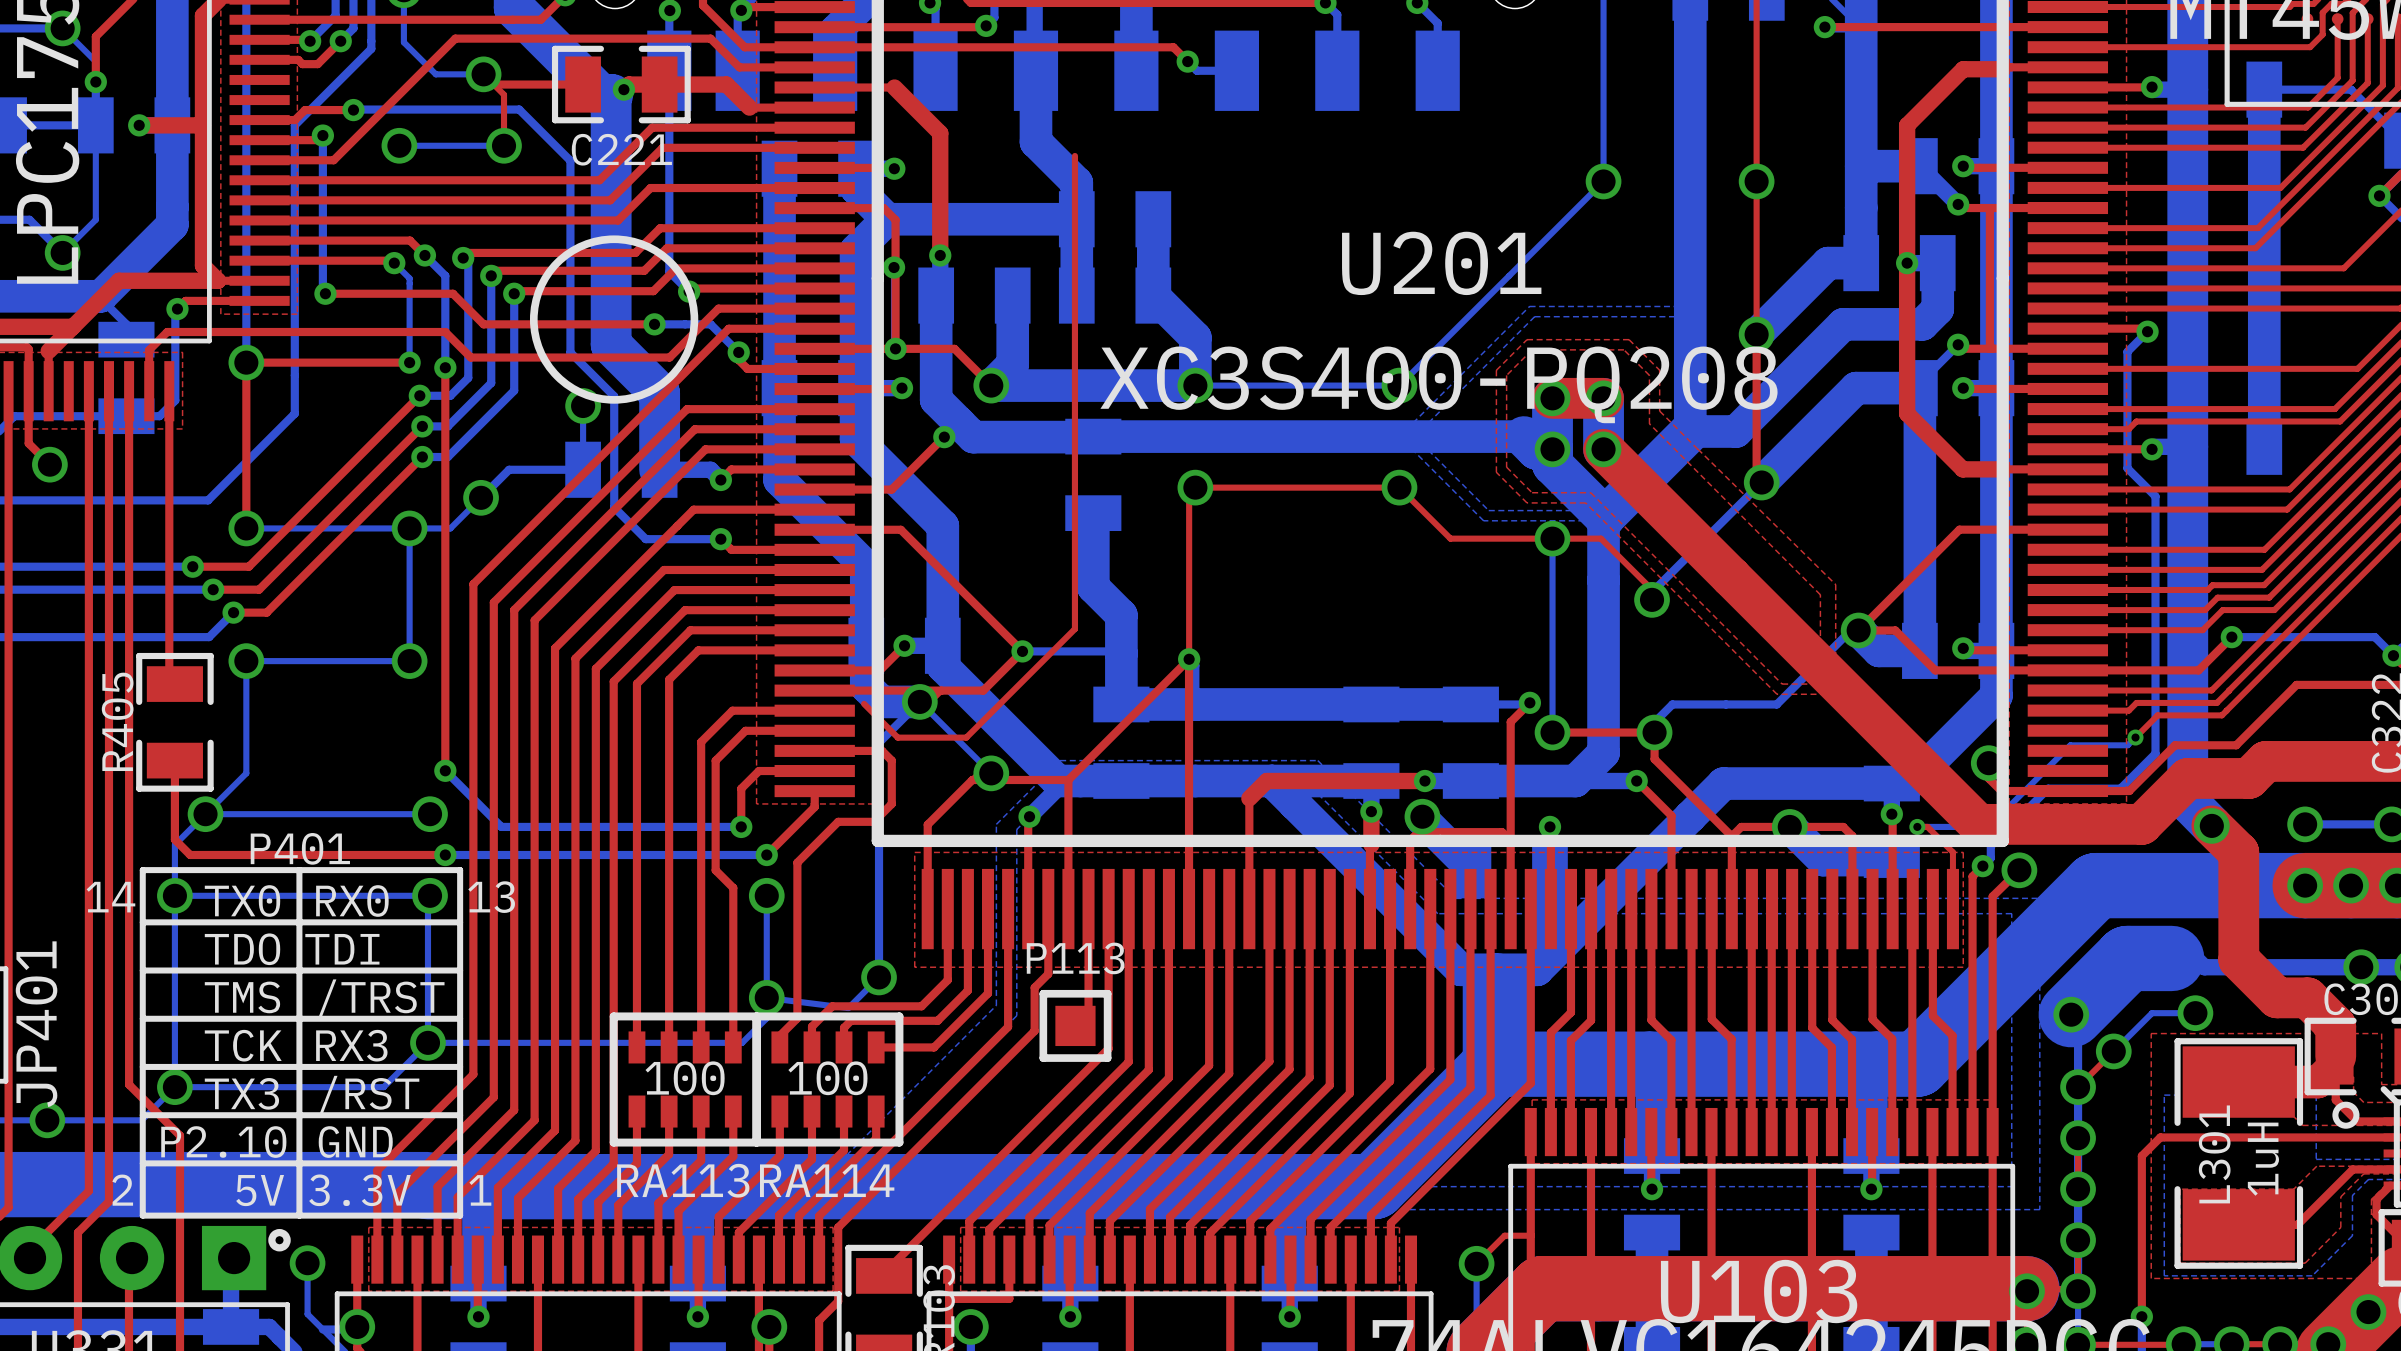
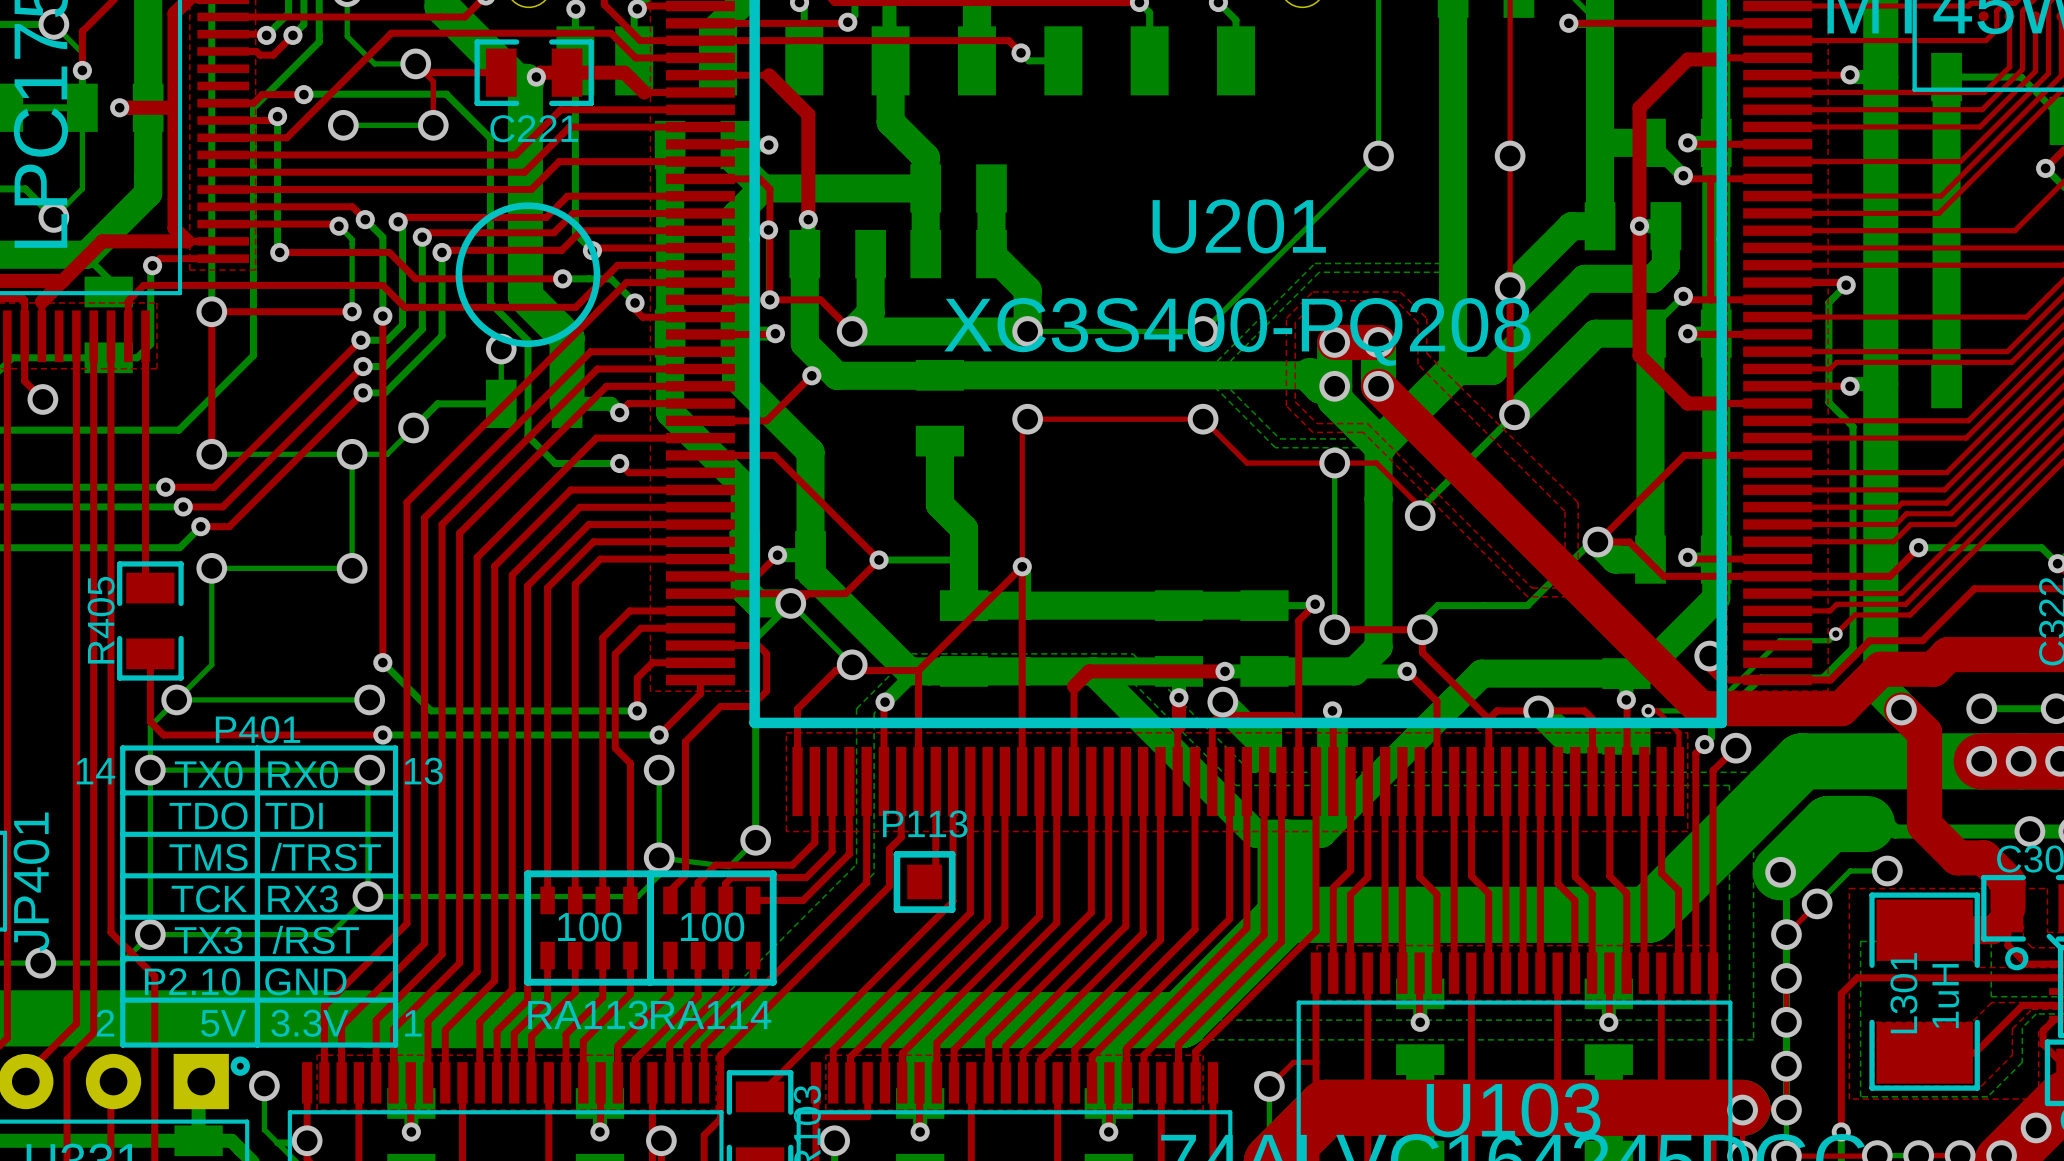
top track: (1074, 155) (1074, 629) (966, 737) (897, 737) (864, 703) -> none

